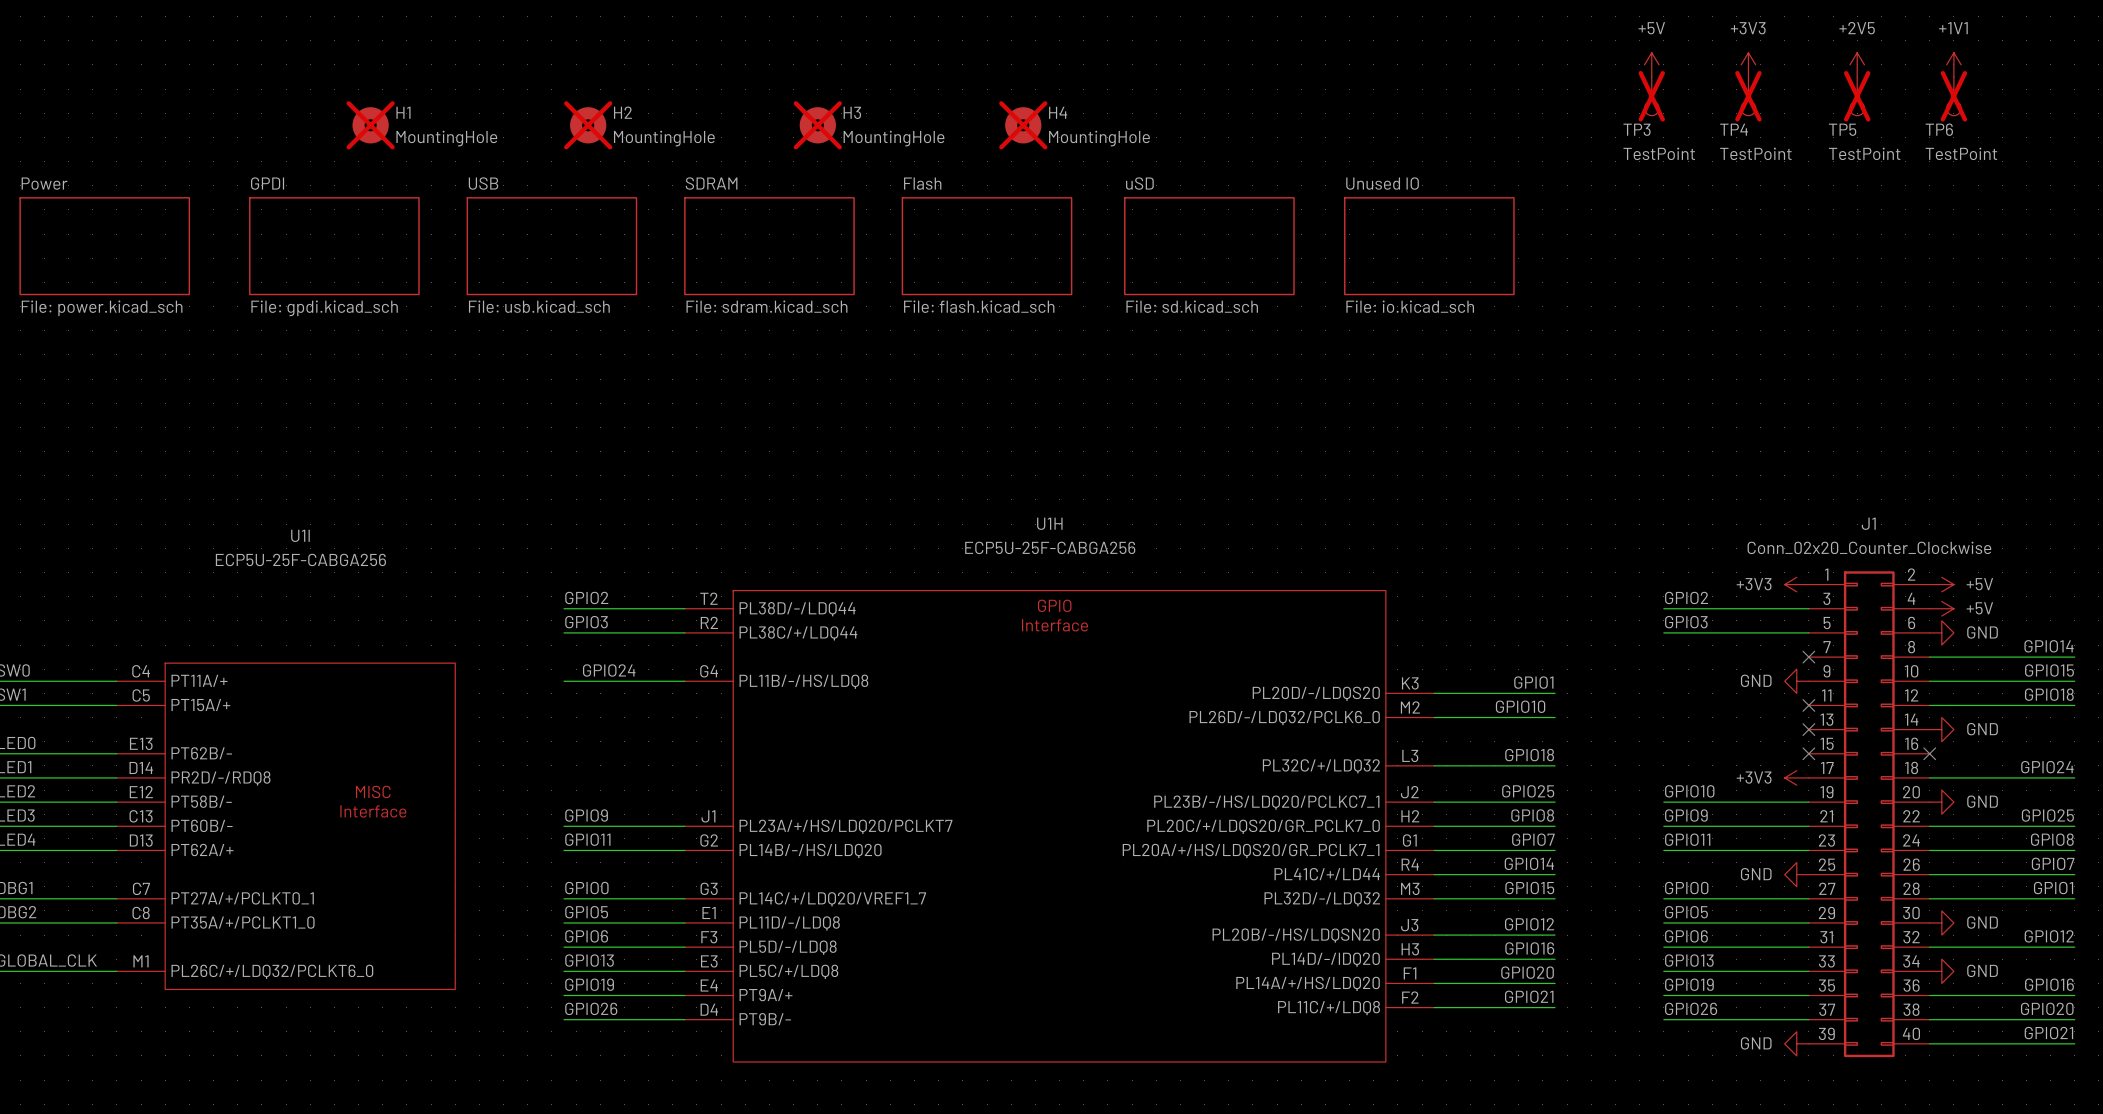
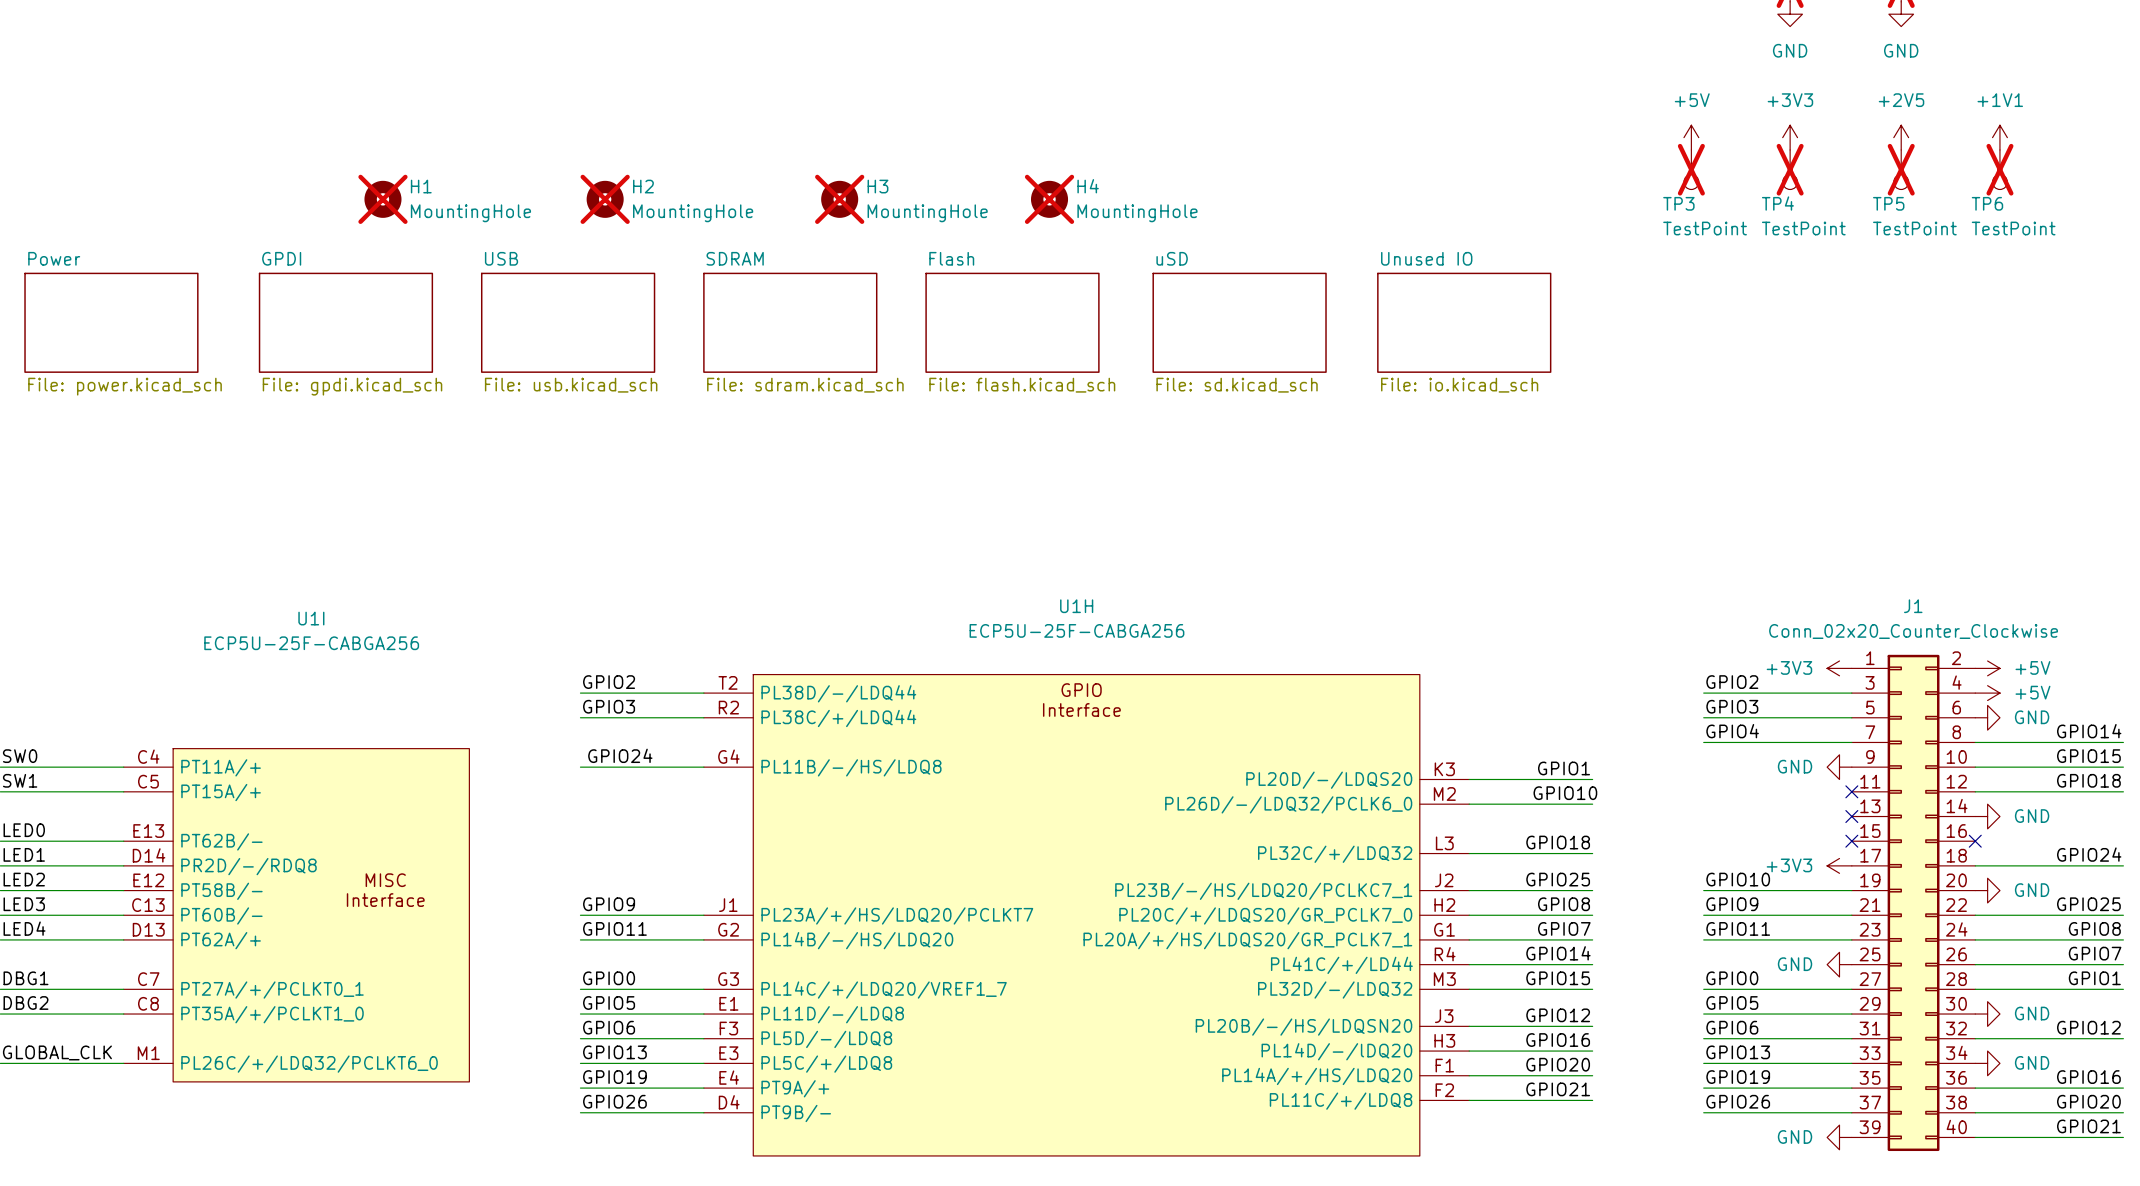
label: none -> GPIO4 (1732, 731)
wire: none -> (1703, 742) (1851, 742)
no-connect mark: (1808, 657) -> none

